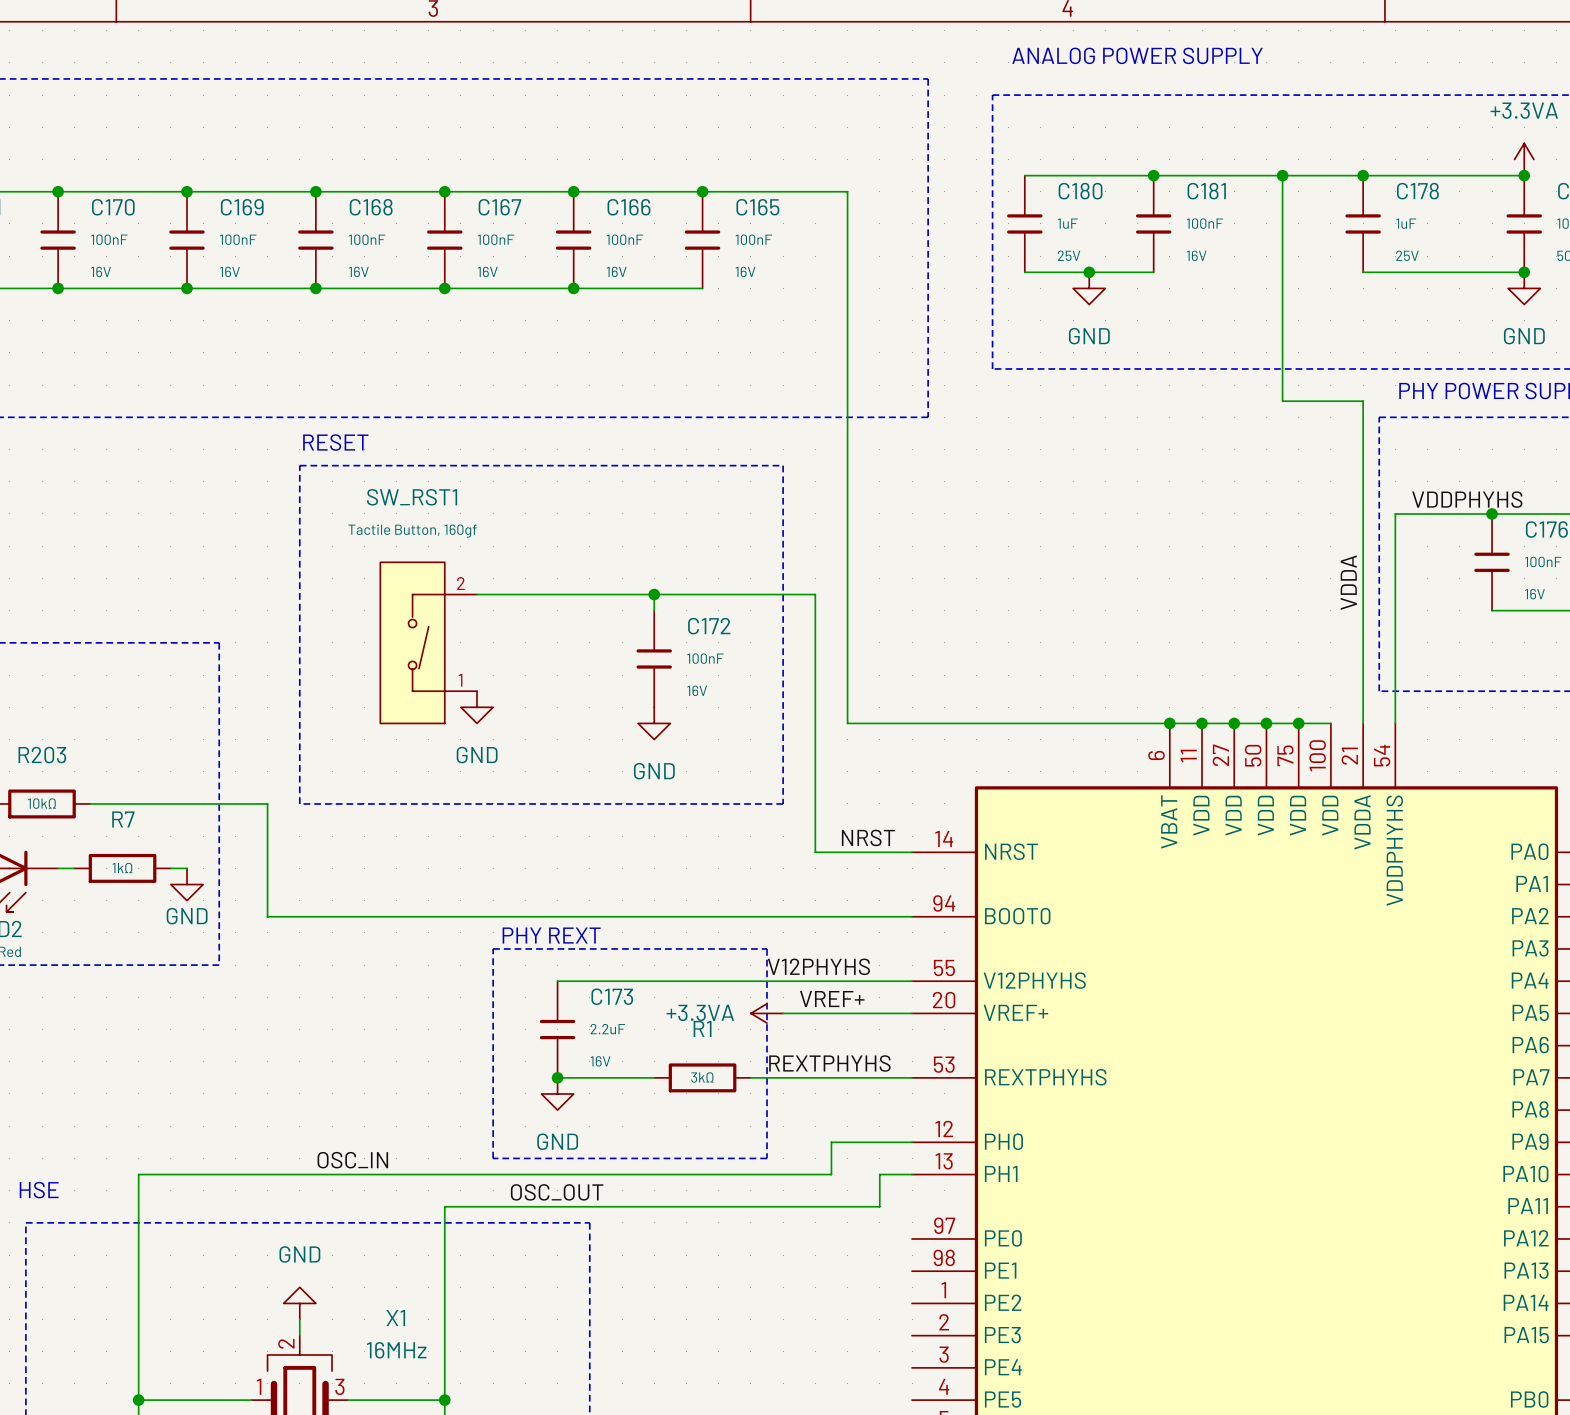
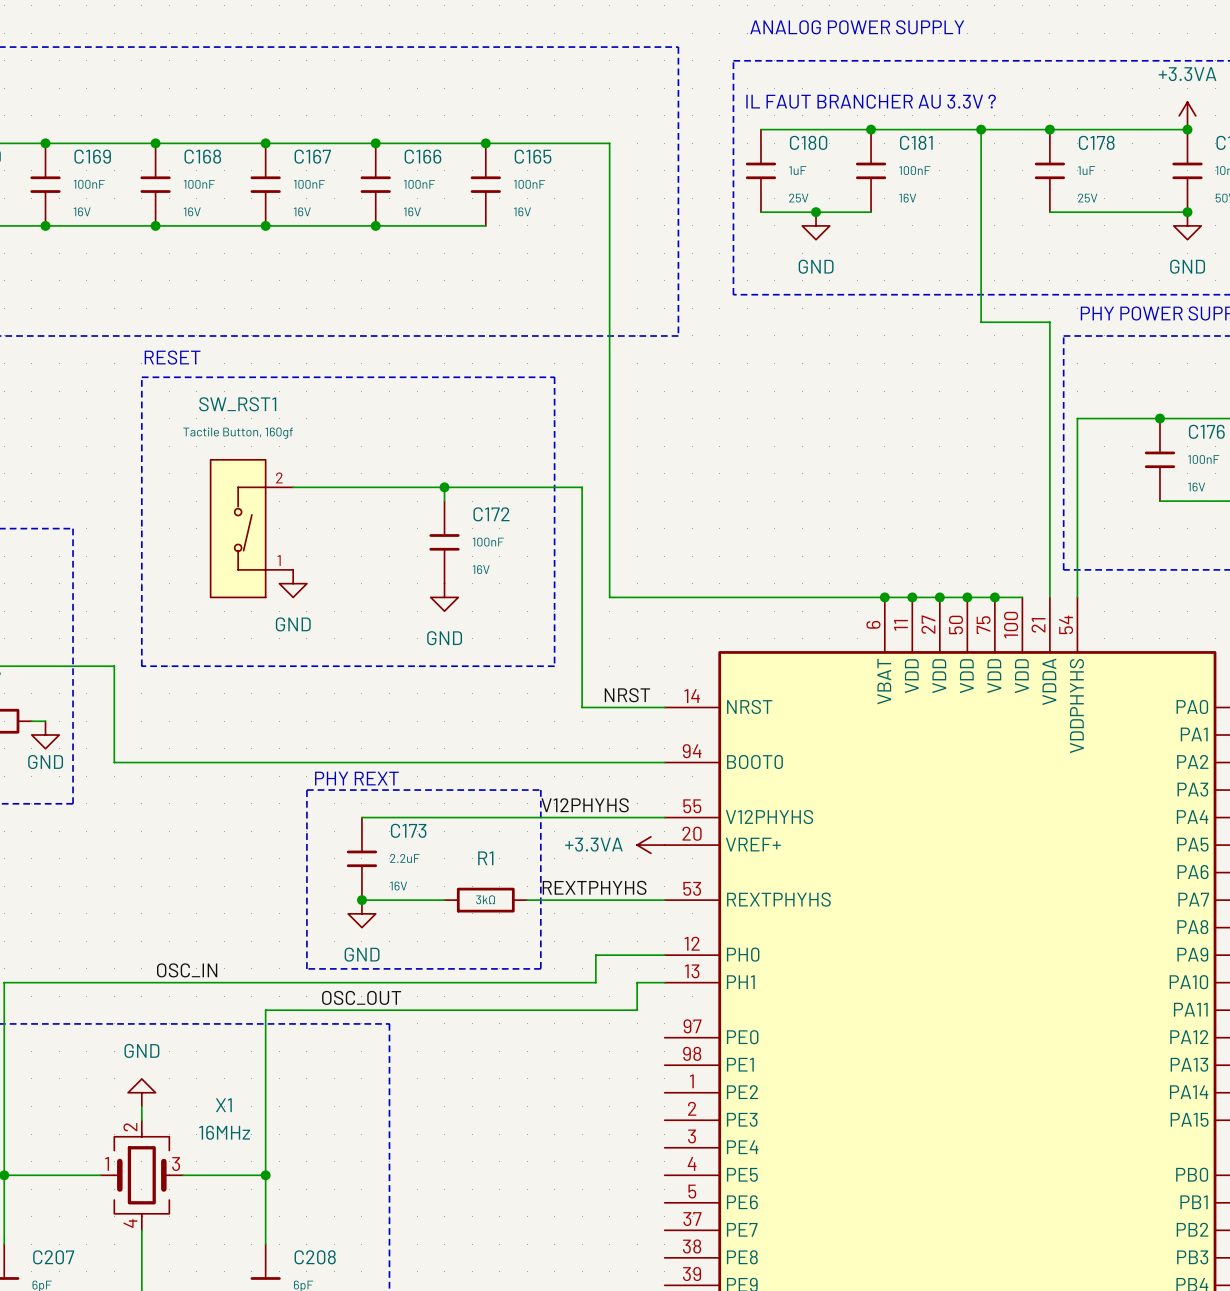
text: none -> IL FAUT BRANCHER AU 3.3V ? (871, 101)
label: VDDPHYHS (1467, 499) -> none
label: VDDA (1348, 582) -> none
label: VREF+ (832, 999) -> none
power symbol position: +3.3VA (767, 1013) -> +3.3VA (650, 845)
wire: (783, 1013) (912, 1013) -> none

